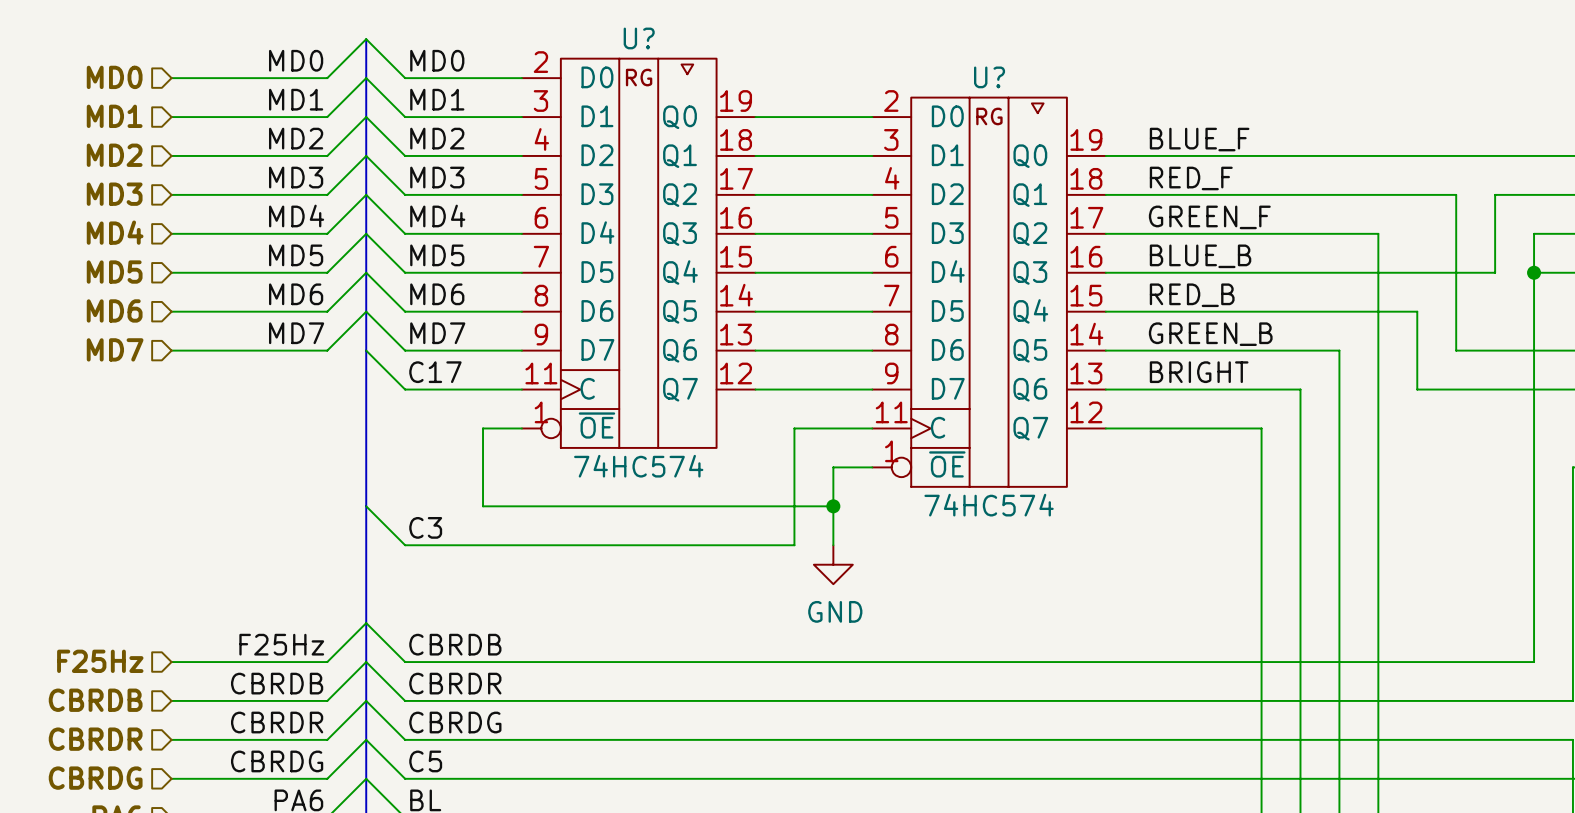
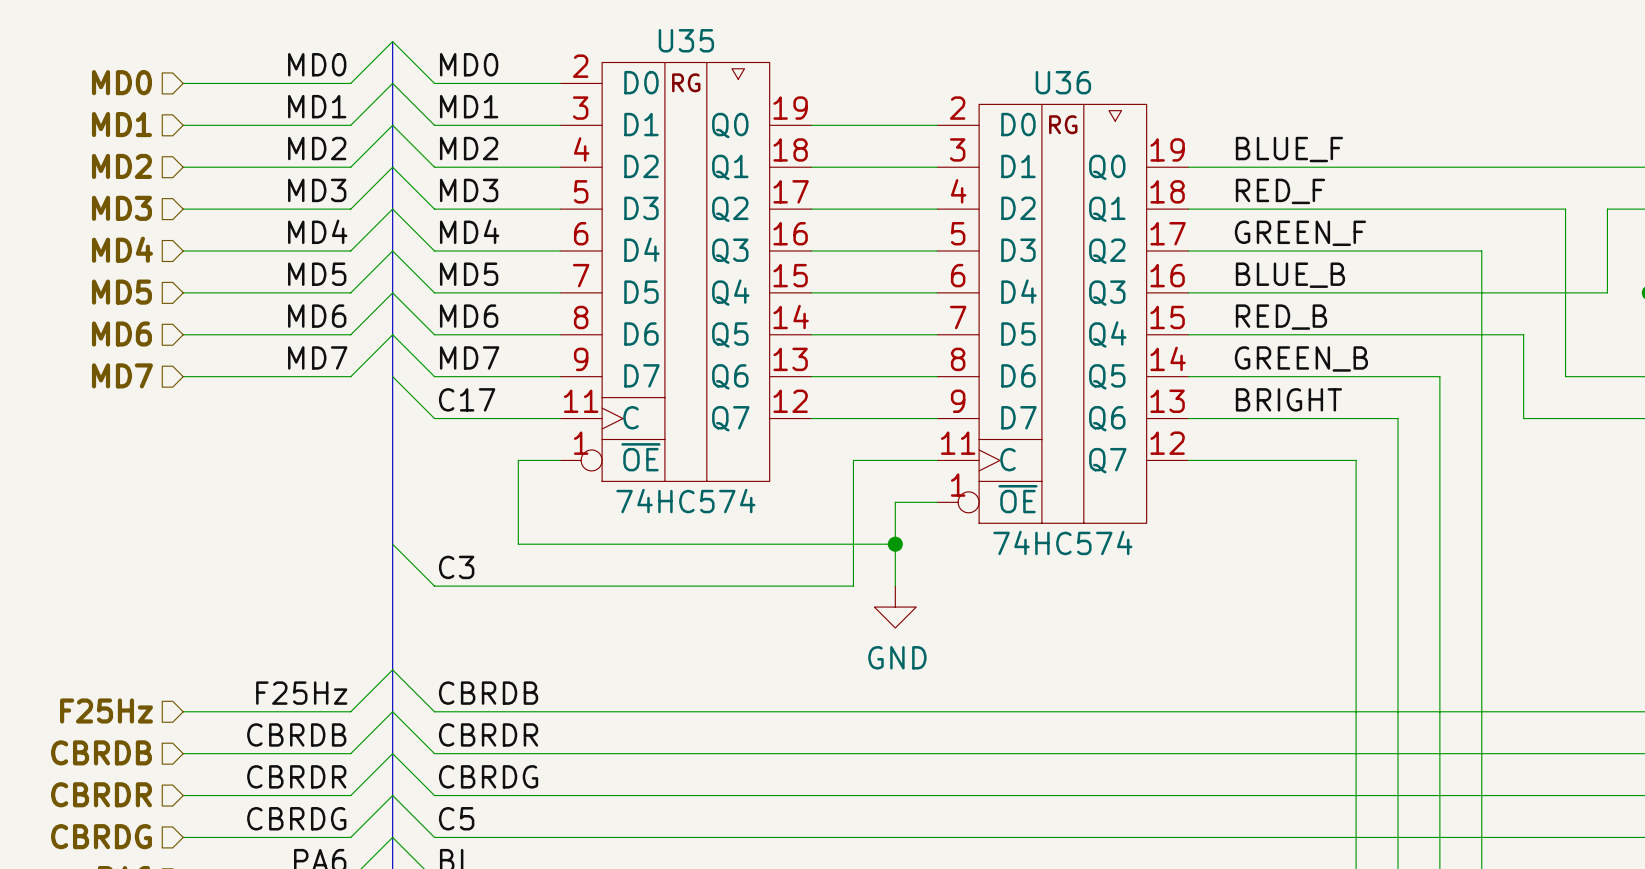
U? name: U? (639, 38) -> U35 (686, 40)
U? name: U? (989, 77) -> U36 (1063, 82)

